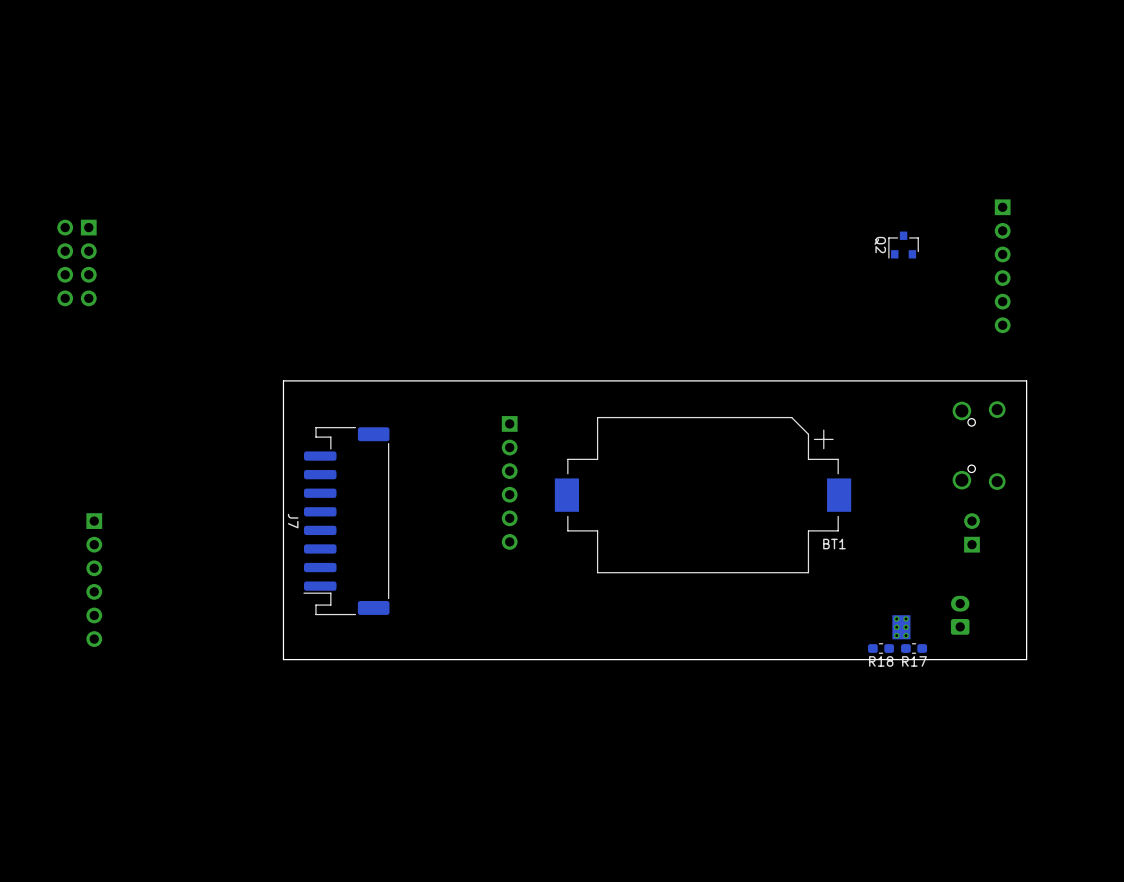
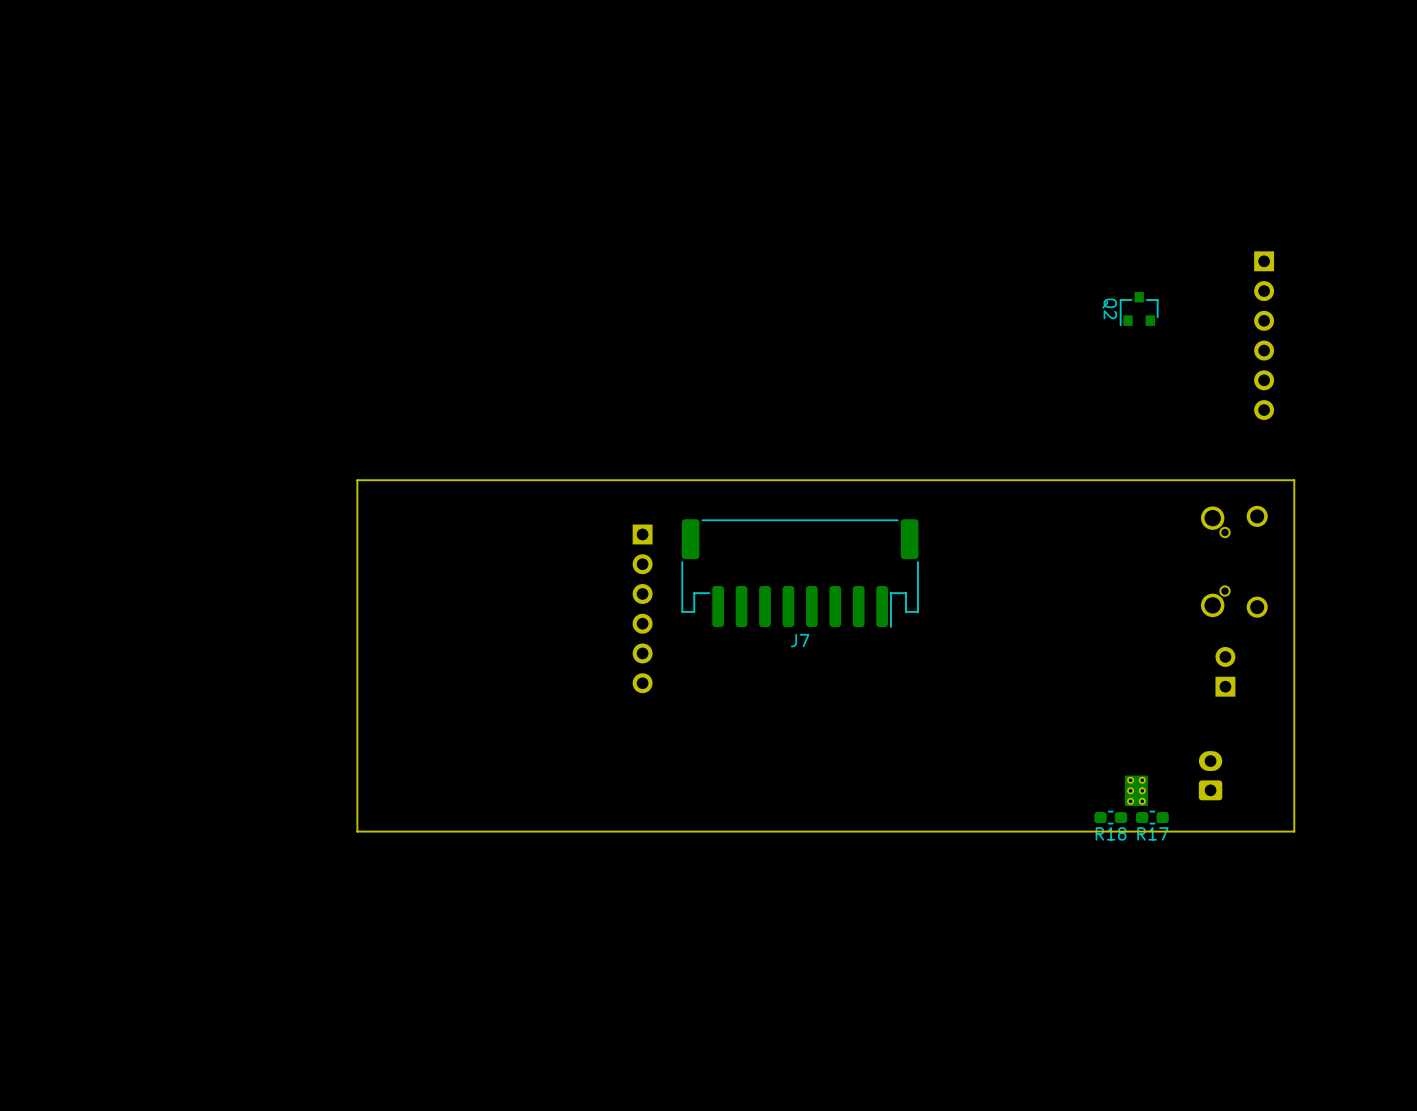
part: (76, 262) -> none
BT1: (703, 495) -> none
J7 rotation: 0° (346, 521) -> 90° counterclockwise (800, 573)
J7 position: (346, 521) -> (800, 573)
part: (94, 580) -> none

